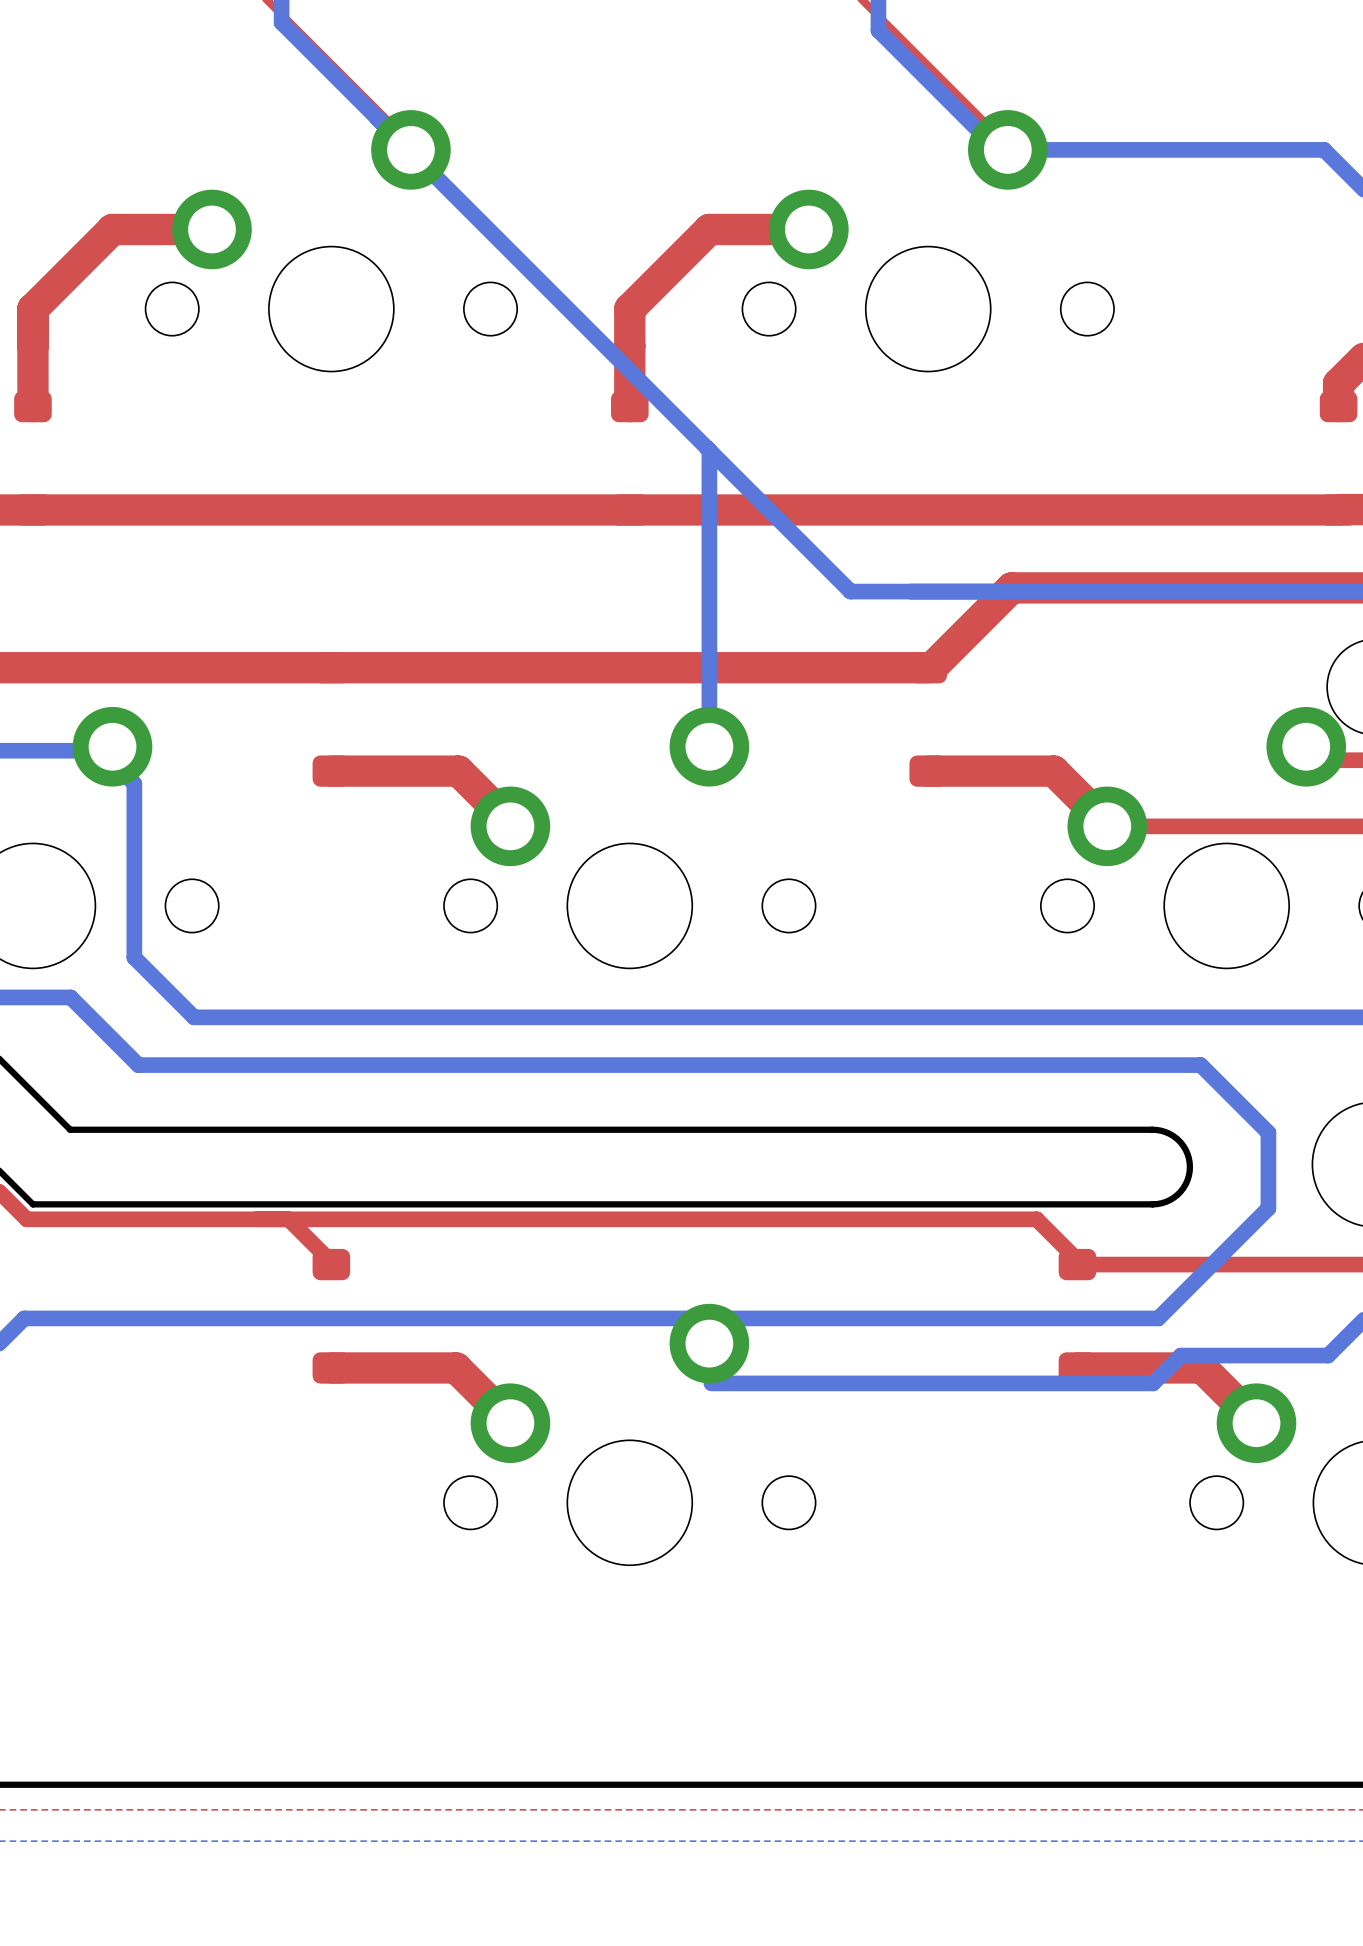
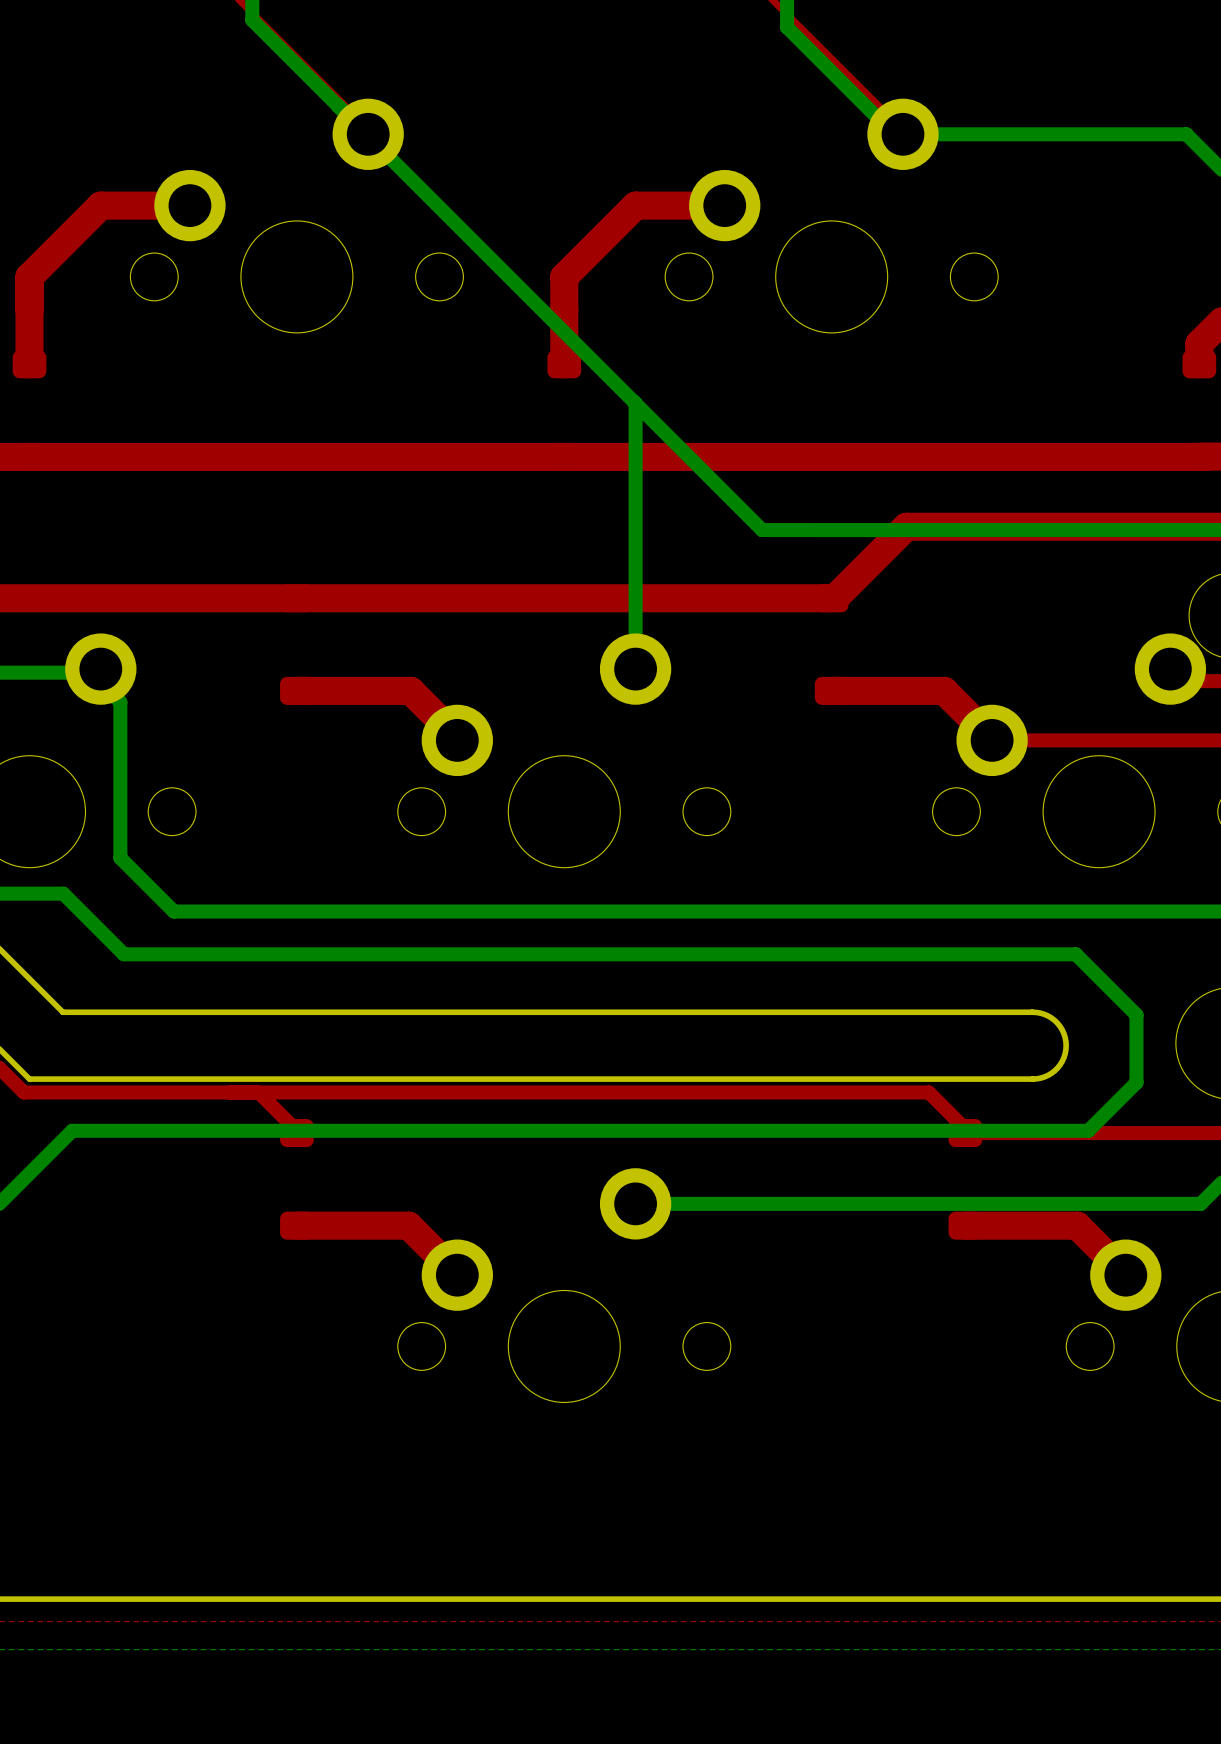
bottom track: (1214, 1262) (1158, 1318) (24, 1318) -> (1088, 1130) (72, 1130) (21, 1181)
bottom track: (1340, 1343) (1328, 1355) (1180, 1355) (1153, 1383) (711, 1383) -> (1200, 1203) (635, 1203)

